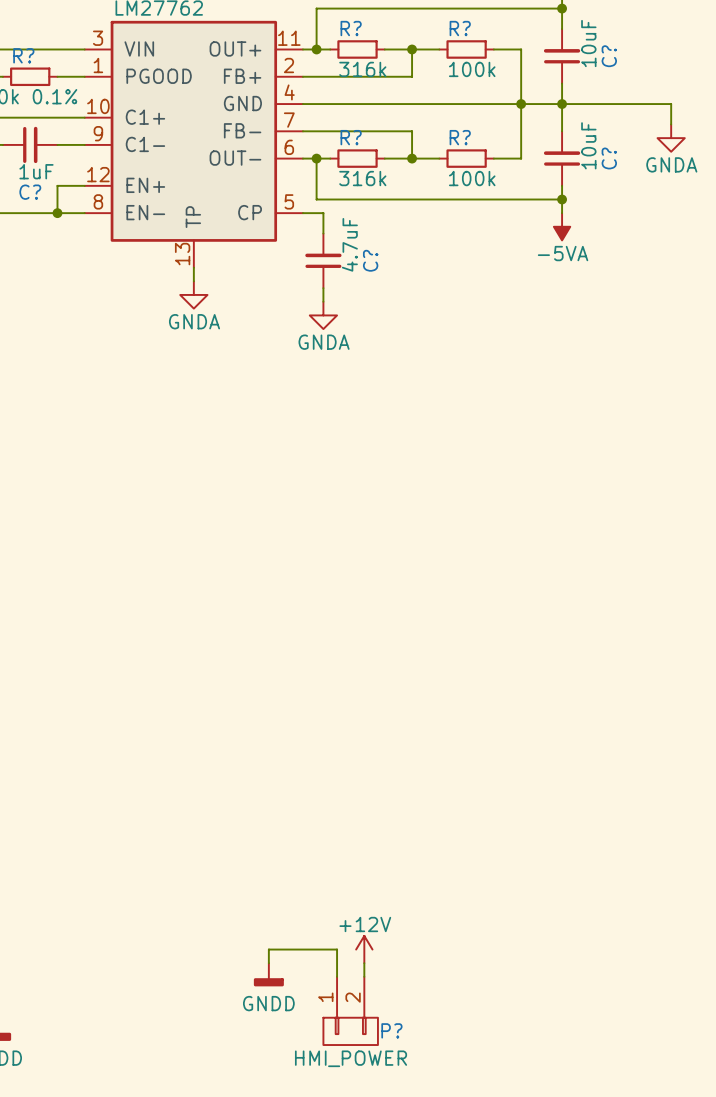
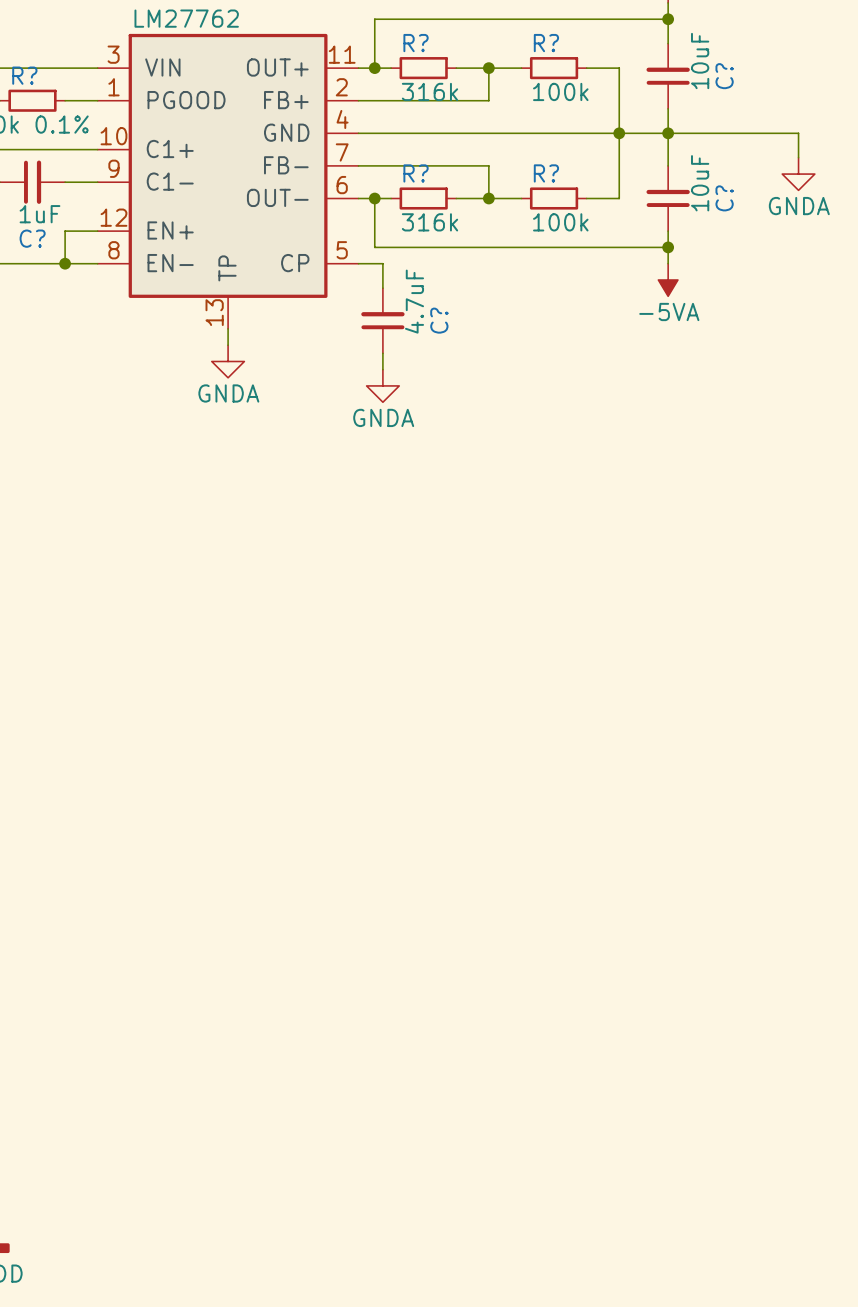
power symbol: +12V (364, 949) -> none
wire: (268, 963) (268, 949) (337, 949) (337, 976) -> none
wire: (364, 963) (364, 976) -> none
power symbol: GNDD (268, 974) -> none
P?: HMI_POWER (350, 1010) -> none

